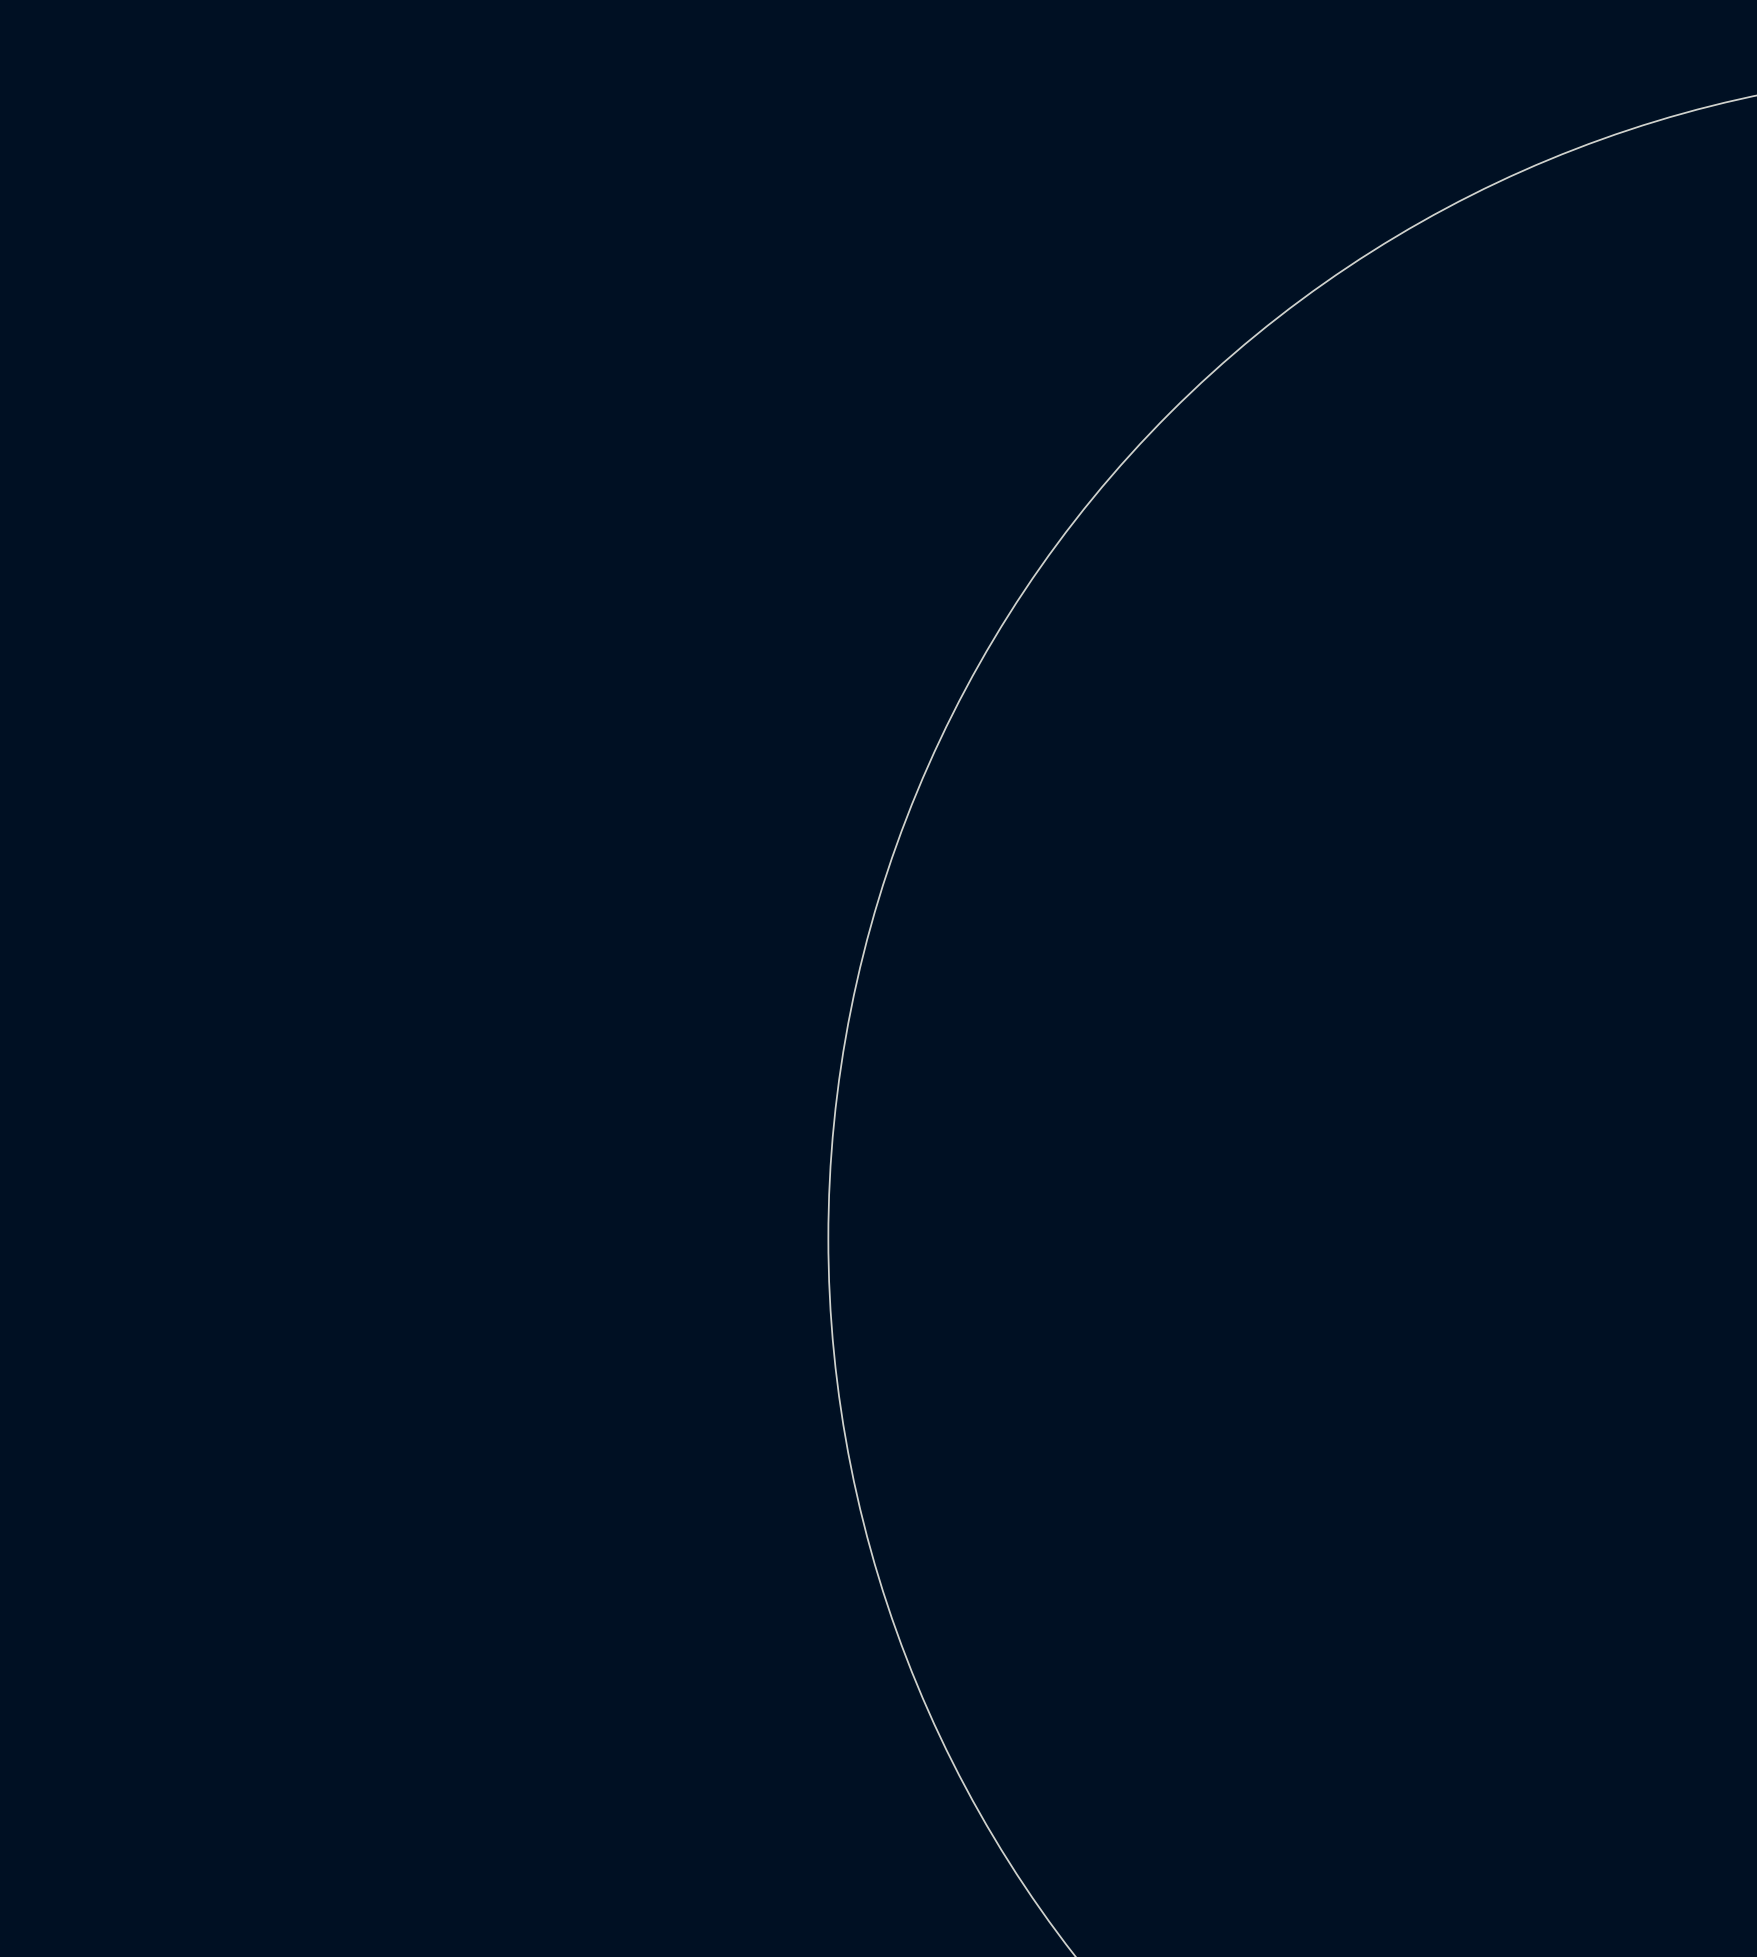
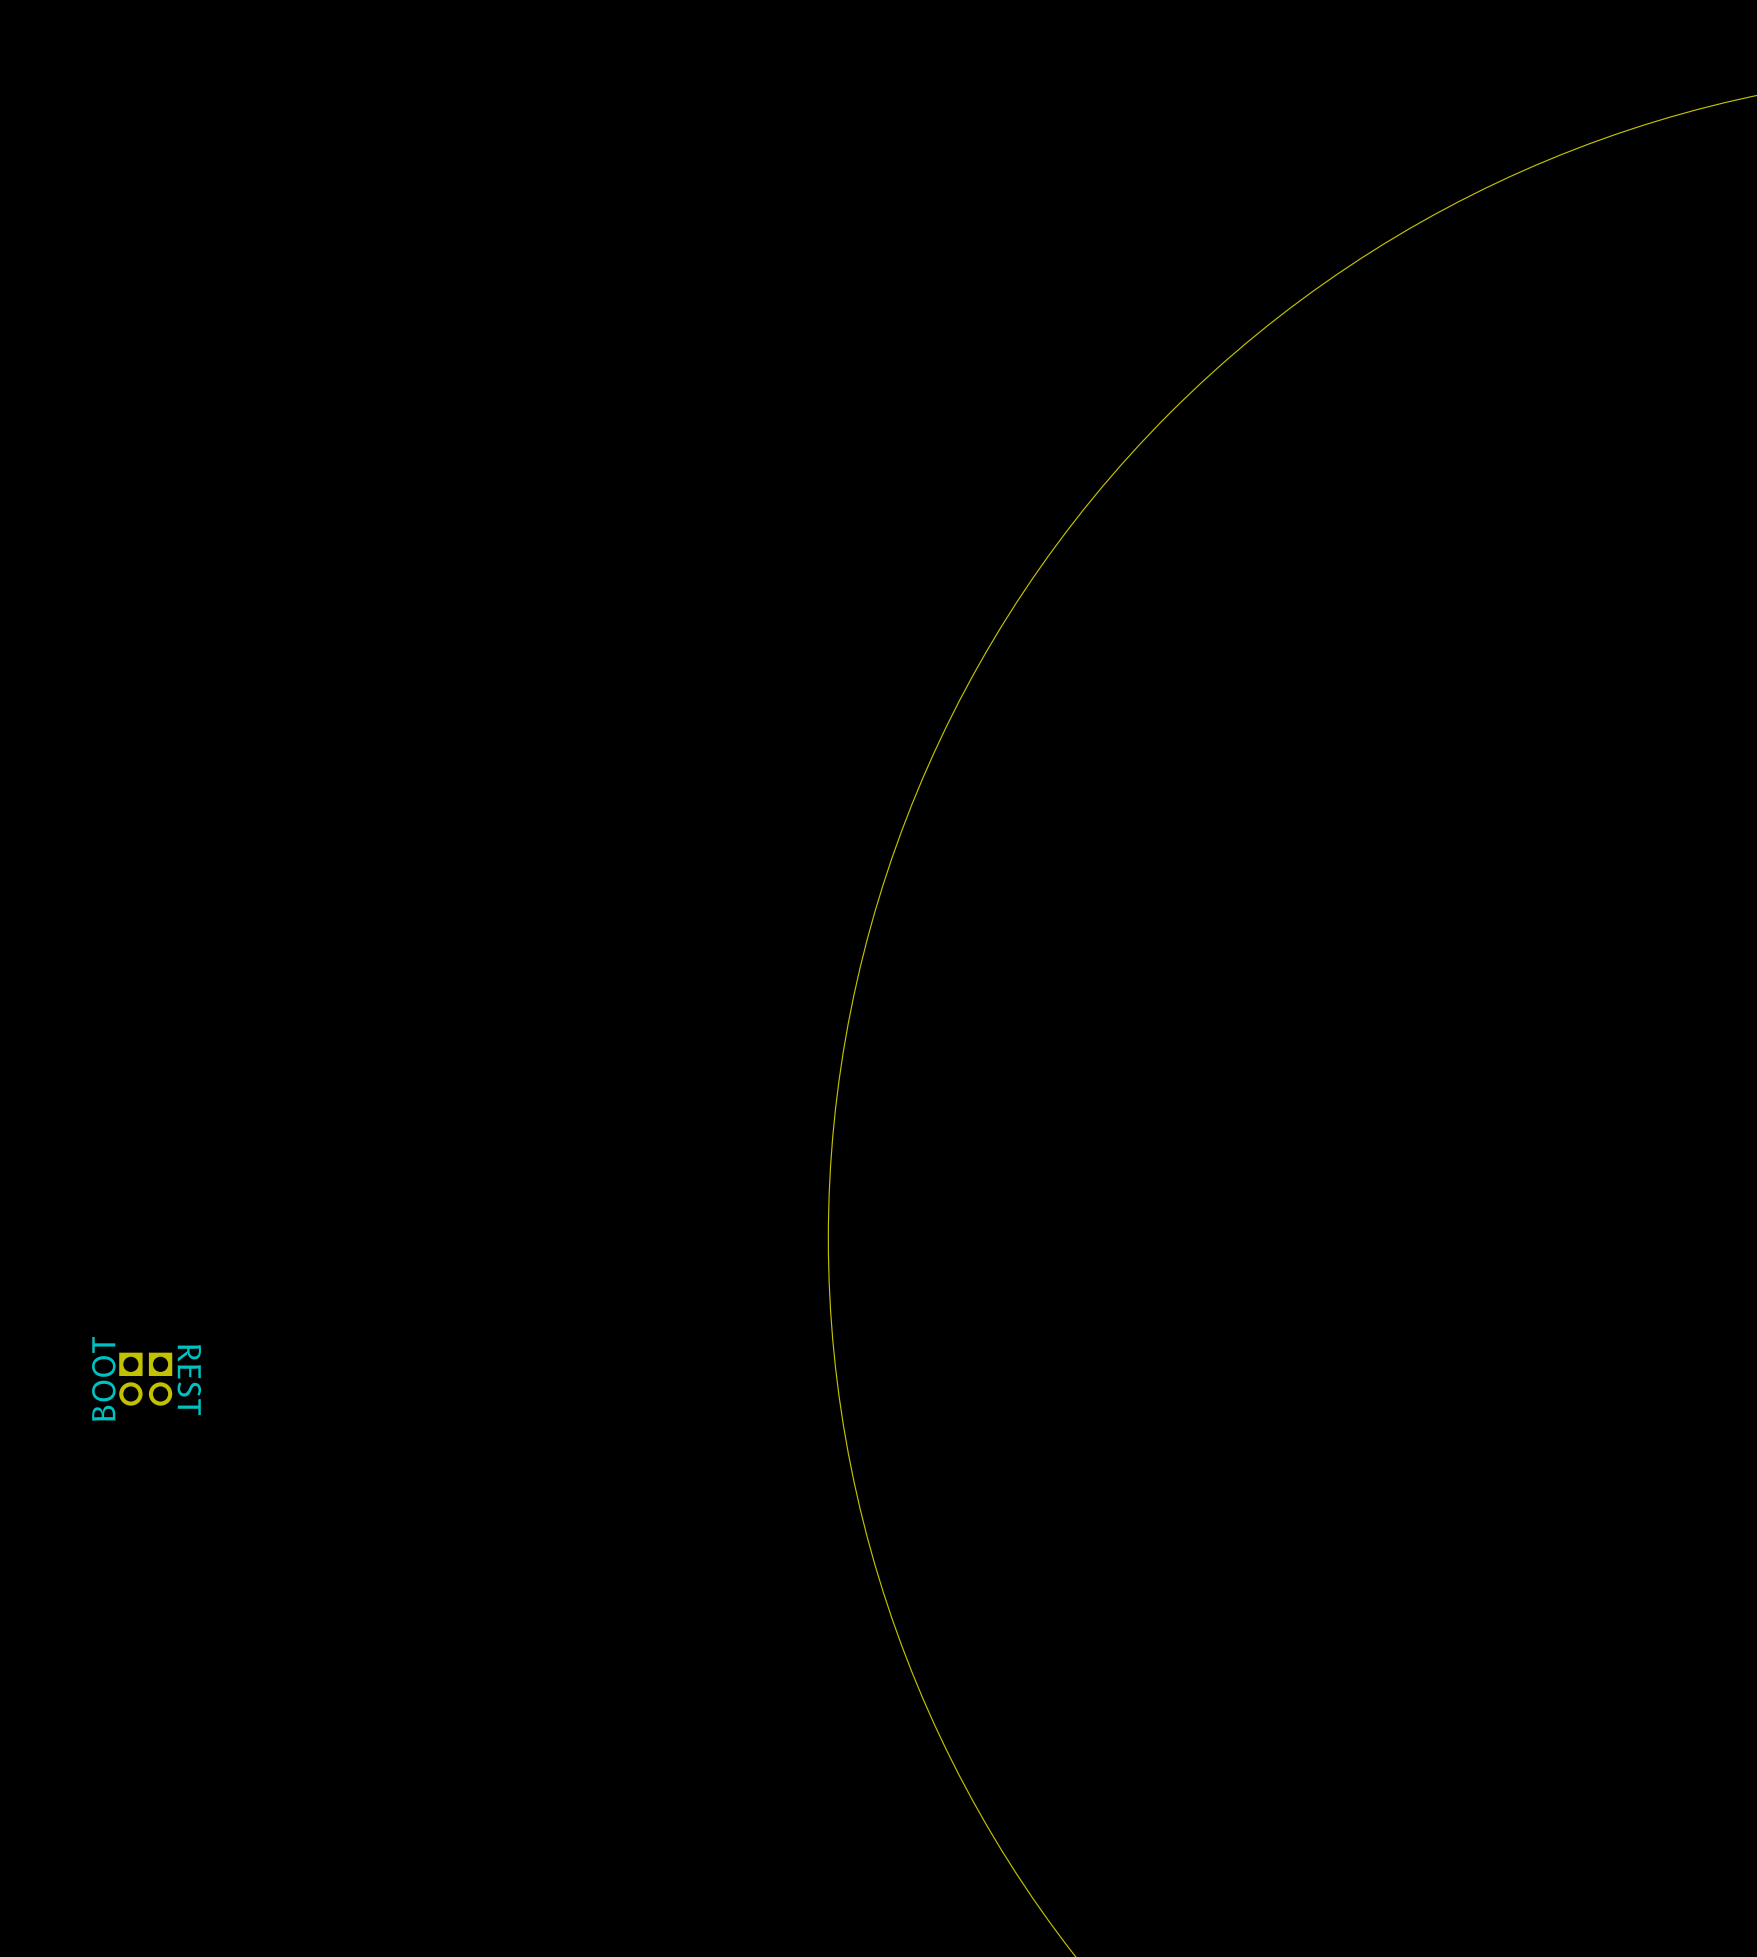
part: none -> BOOT (130, 1379)
part: none -> REST (160, 1379)

